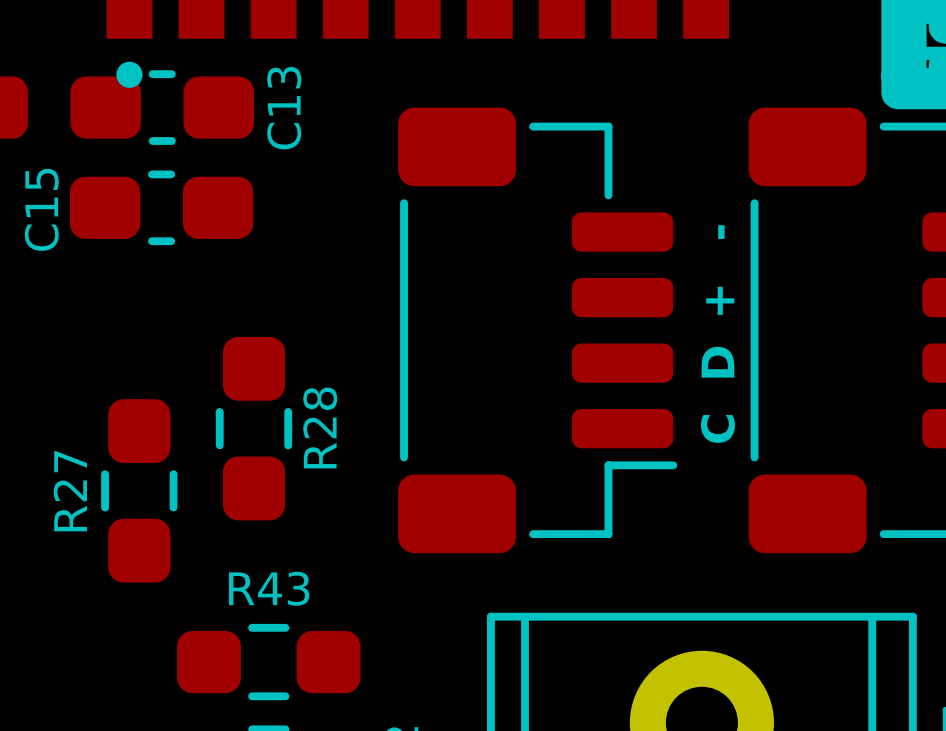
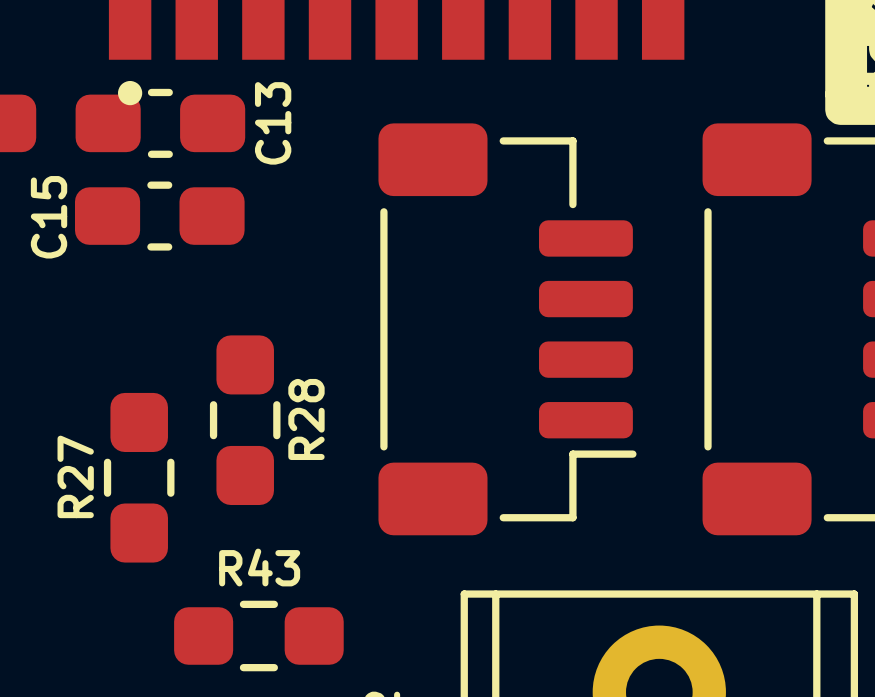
text: - (721, 232) -> none
text: + (720, 300) -> none
text: D (717, 362) -> none
text: C (717, 428) -> none

